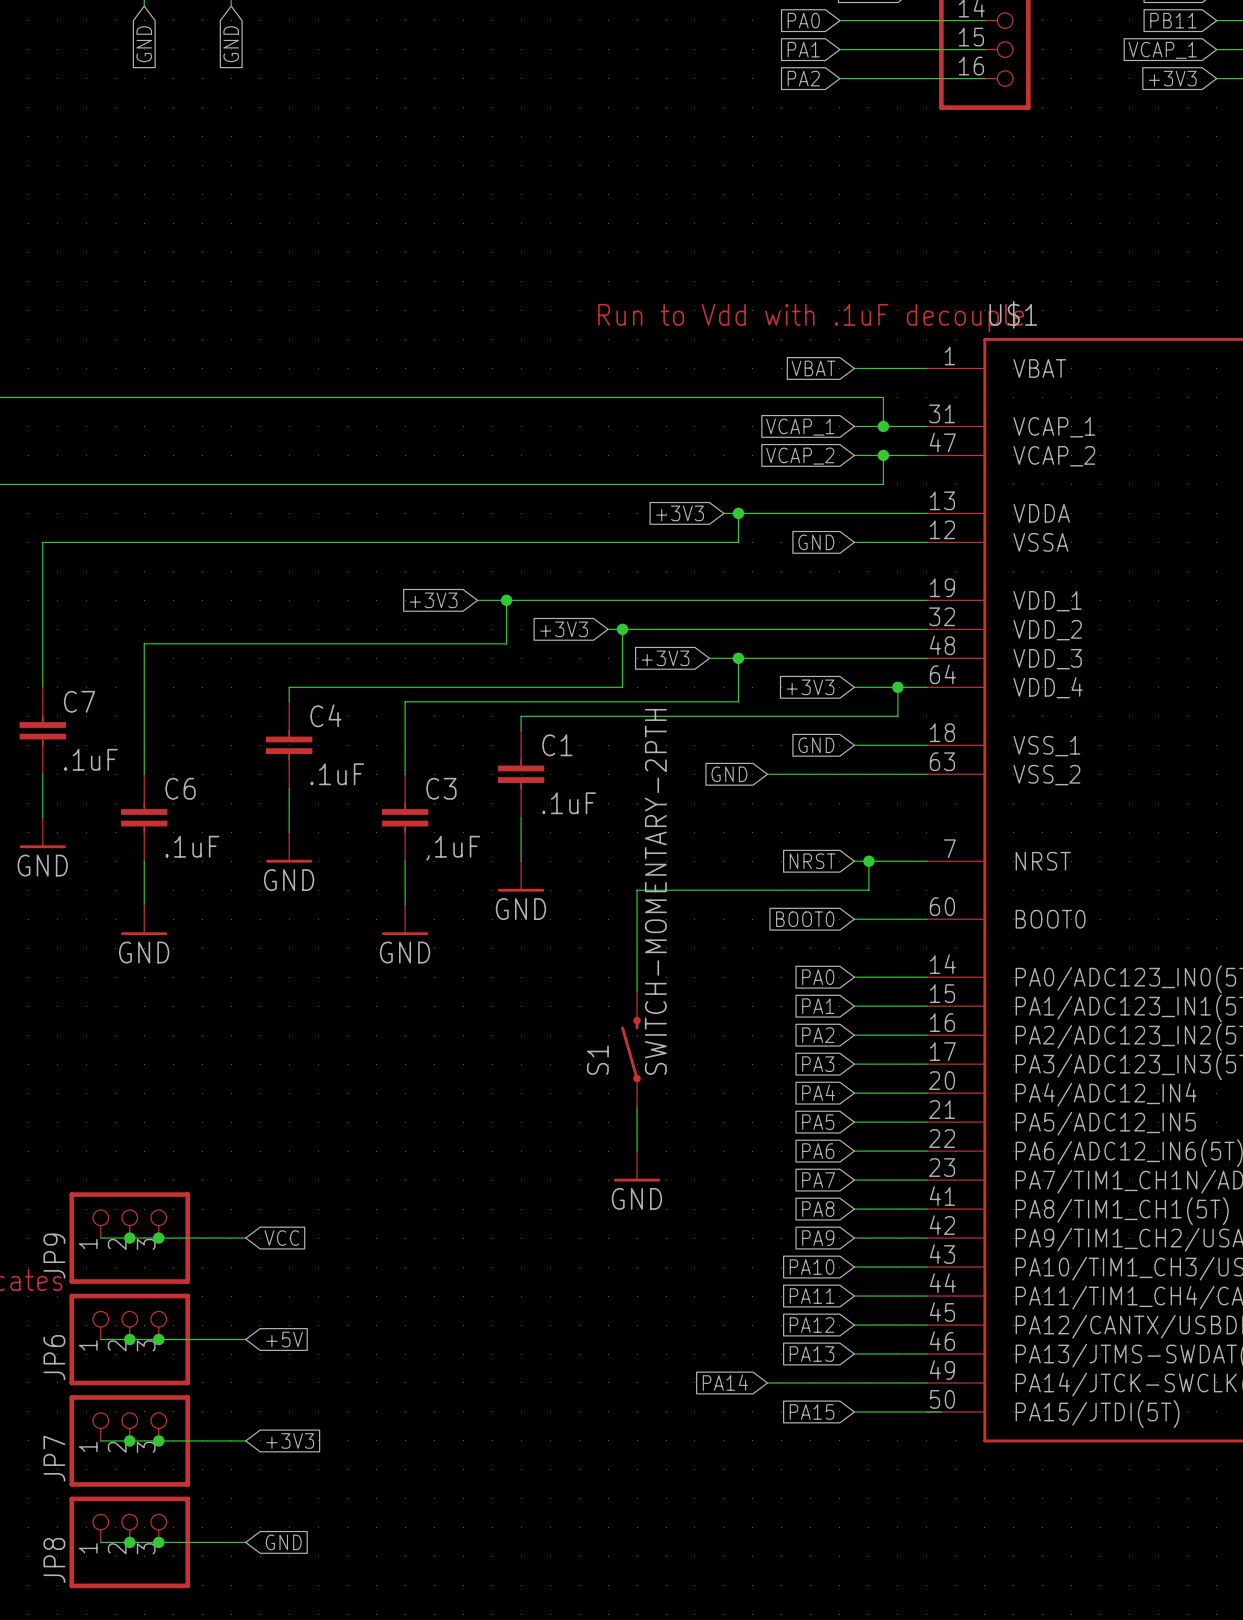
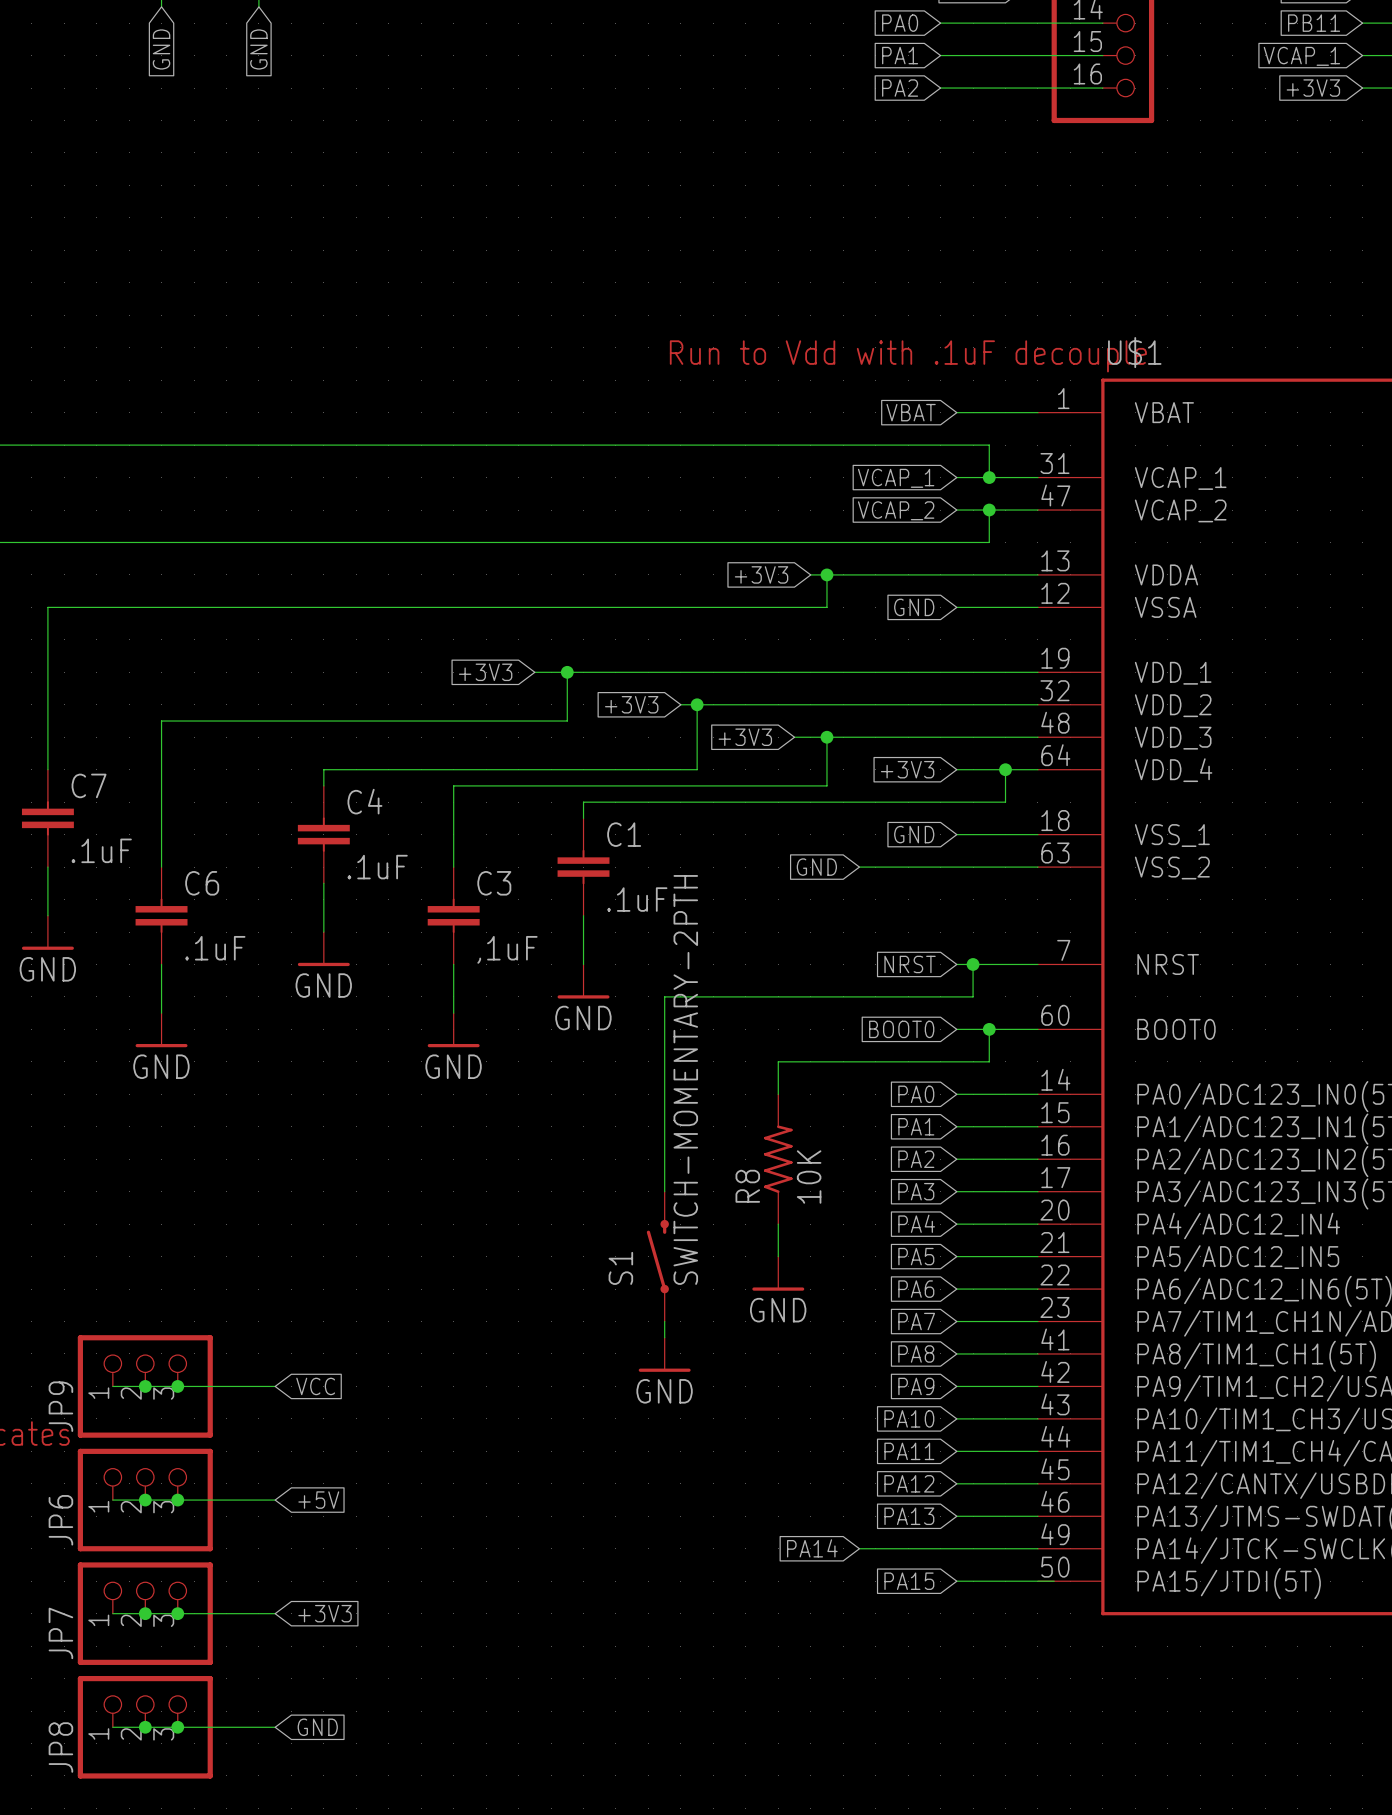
wire: (637, 890) (637, 991) -> (713, 996) (664, 996) (664, 1191)
wire: none -> (989, 1029) (989, 1061) (778, 1061) (778, 1094)
junction: none -> (989, 1029)
R8: none -> 10K (778, 1159)
S1 position: (630, 1049) -> (657, 1256)
wire: none -> (778, 1224) (778, 1256)
wire: (637, 1107) (637, 1151) -> none
power symbol: none -> GND (778, 1273)
power symbol: GND (637, 1166) -> none
wire: none -> (664, 1321) (664, 1337)
power symbol: none -> GND (664, 1354)

